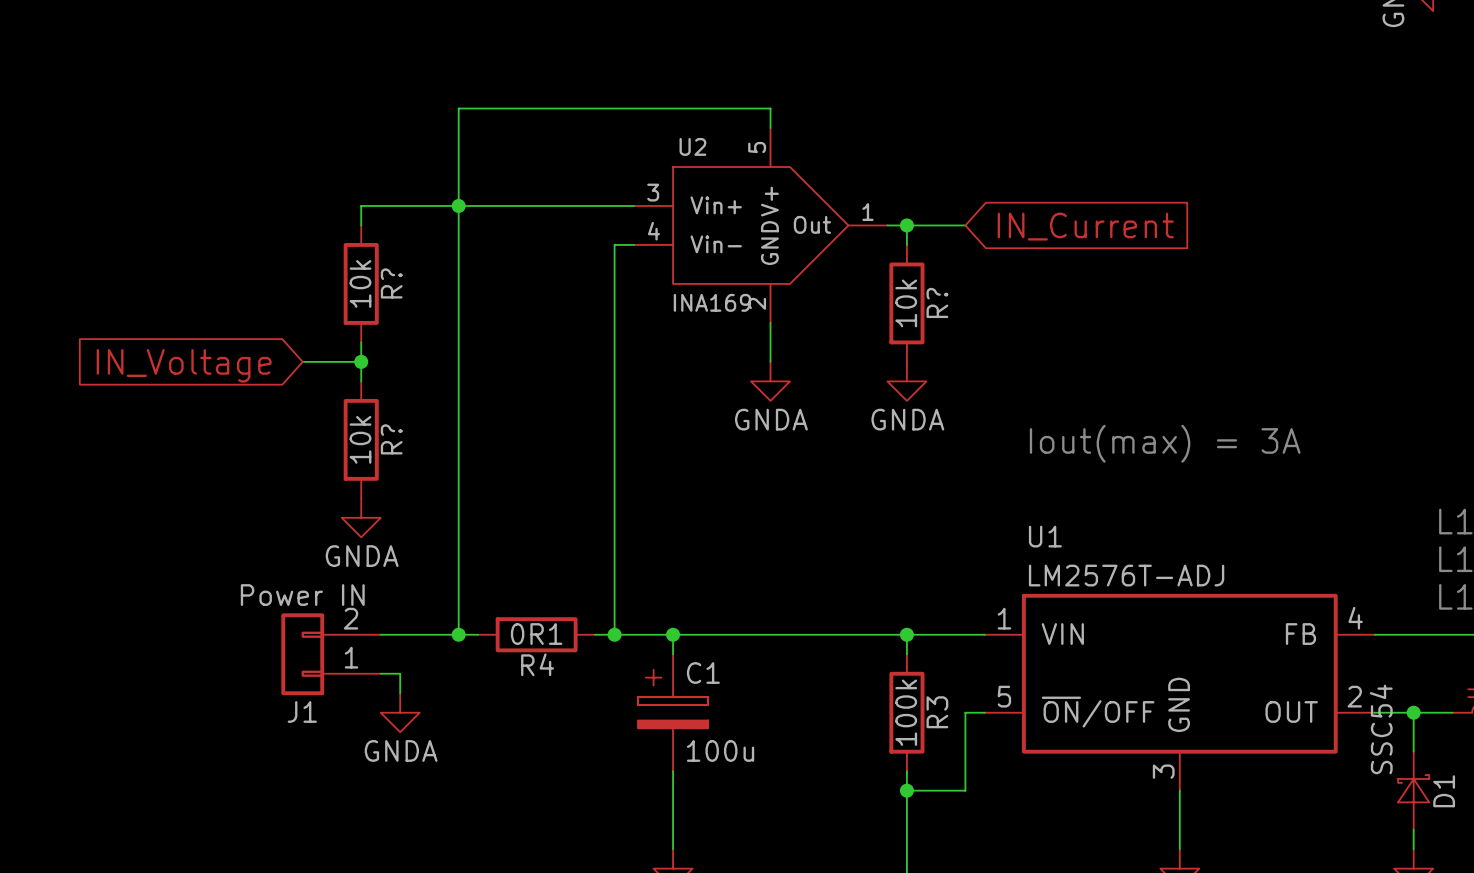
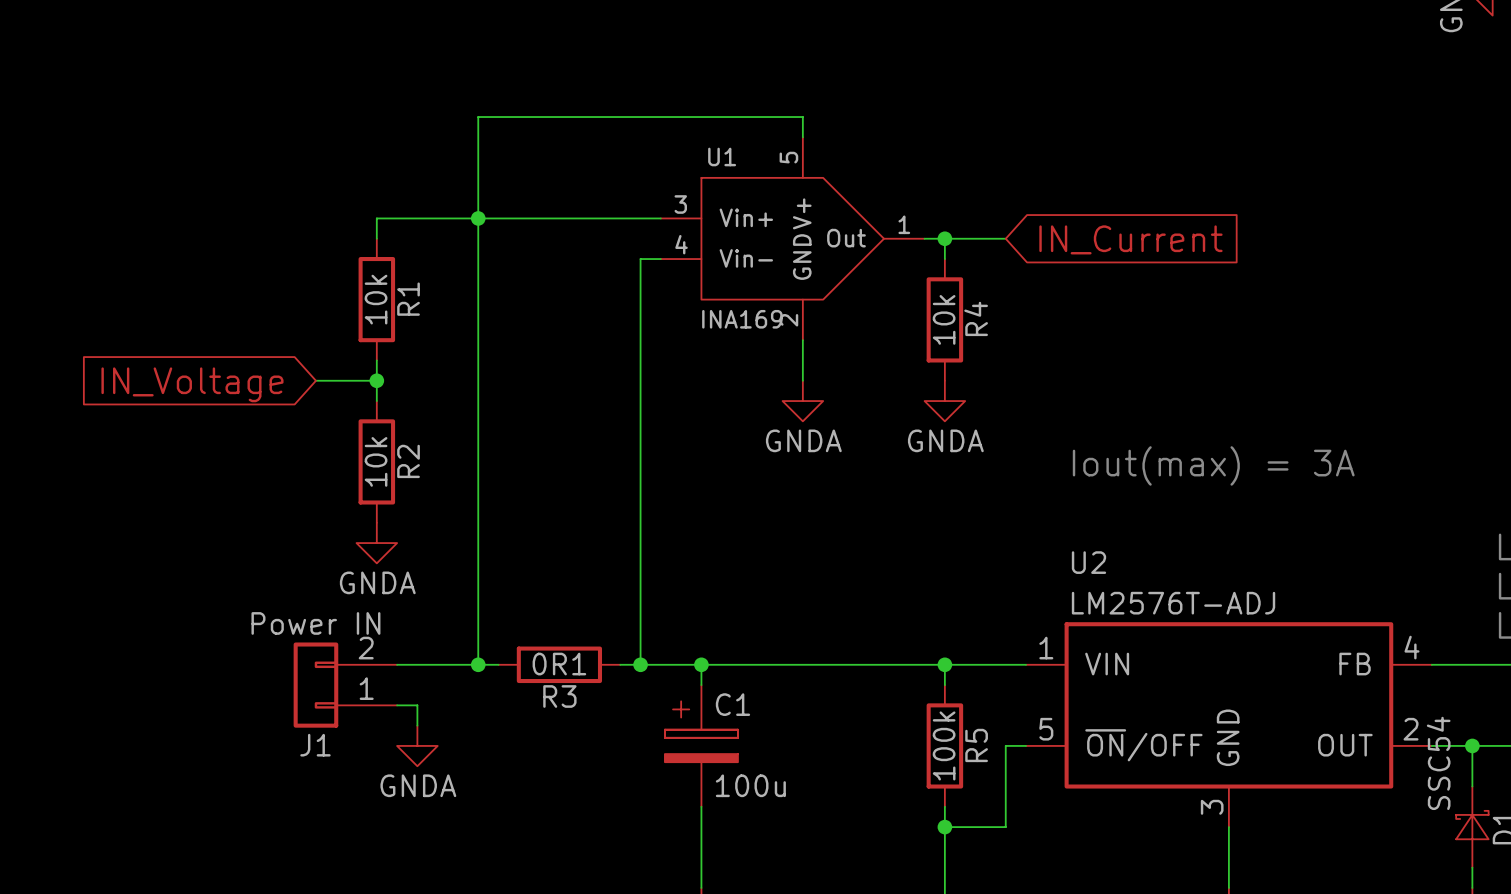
U2 name: U2 (692, 146) -> U1 (722, 156)
R? name: R? (391, 283) -> R1 (408, 299)
R? name: R? (937, 302) -> R4 (976, 318)
R? name: R? (391, 439) -> R2 (408, 461)
U1 name: U1 (1045, 536) -> U2 (1088, 562)
R4 name: R4 (537, 664) -> R3 (559, 696)
R3 name: R3 (937, 712) -> R5 (976, 745)

